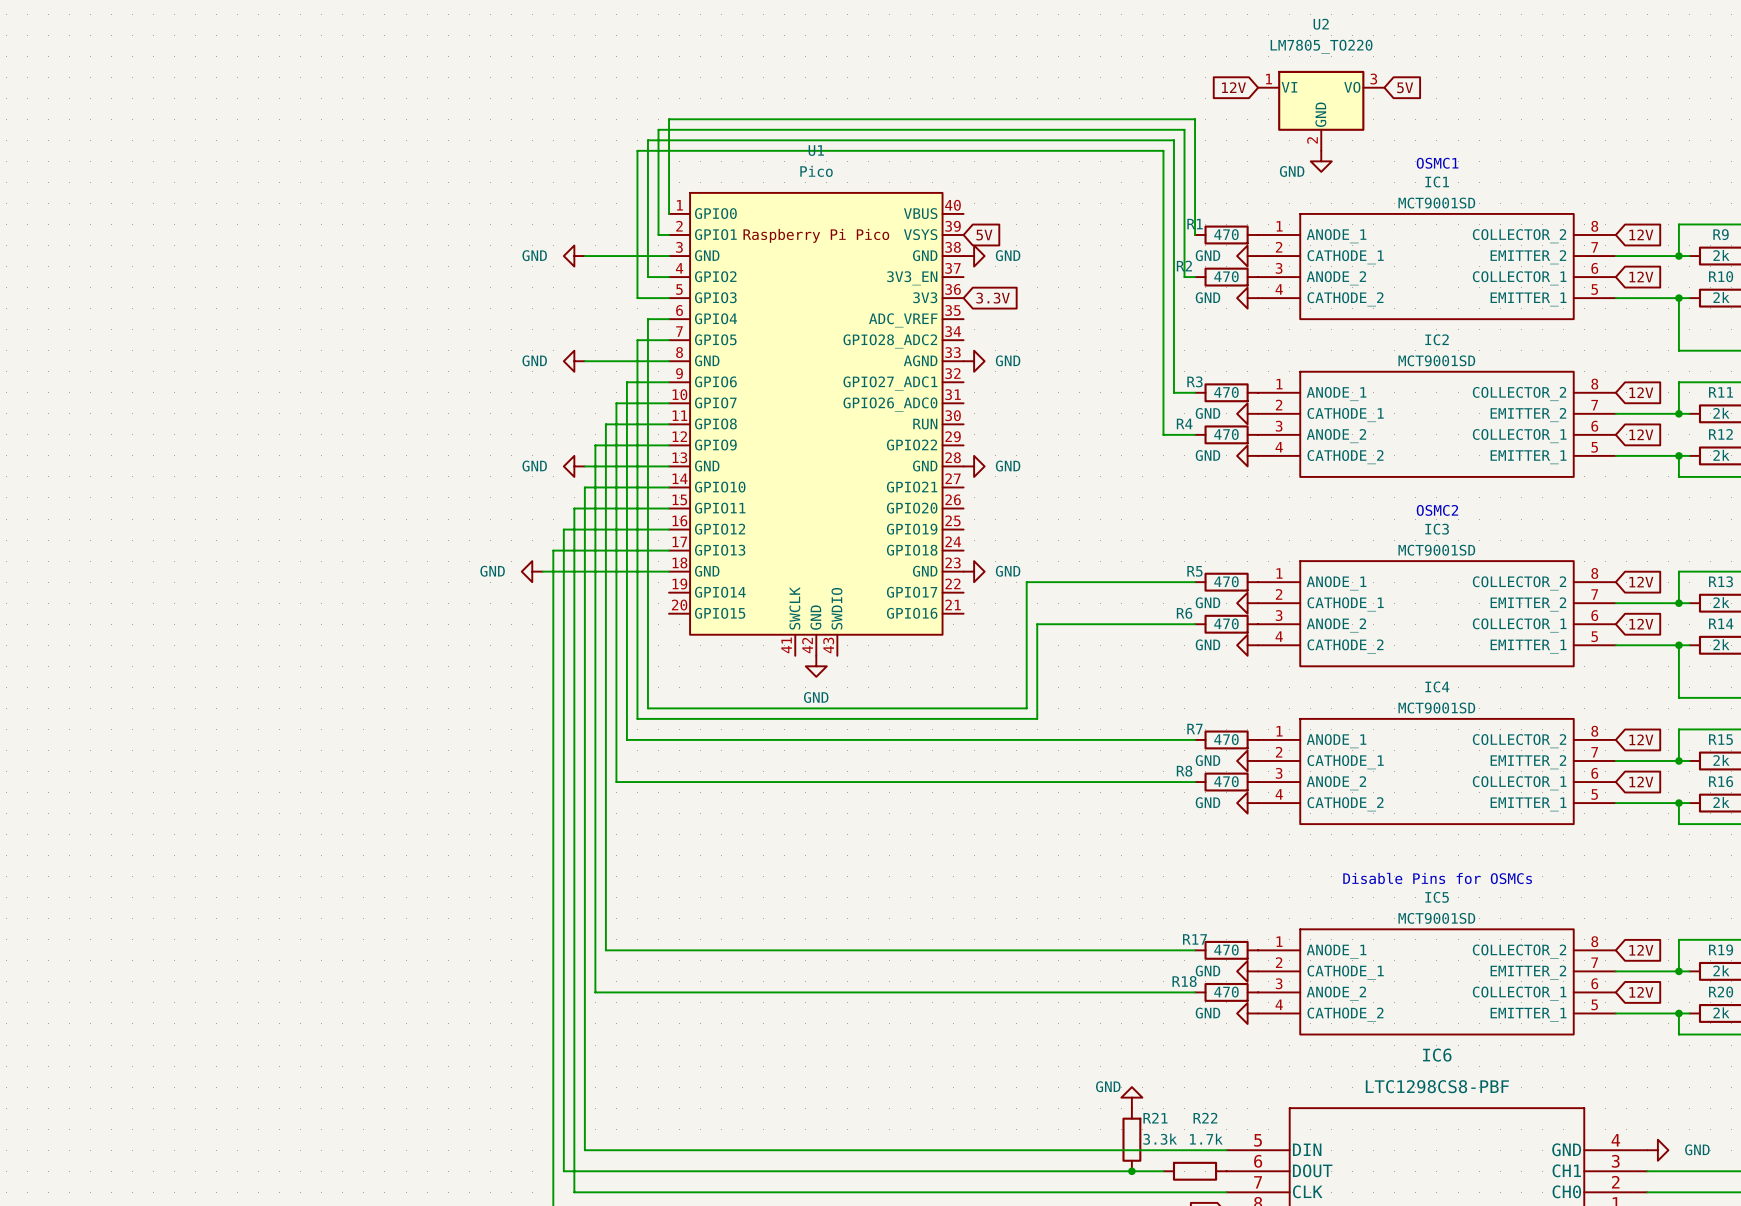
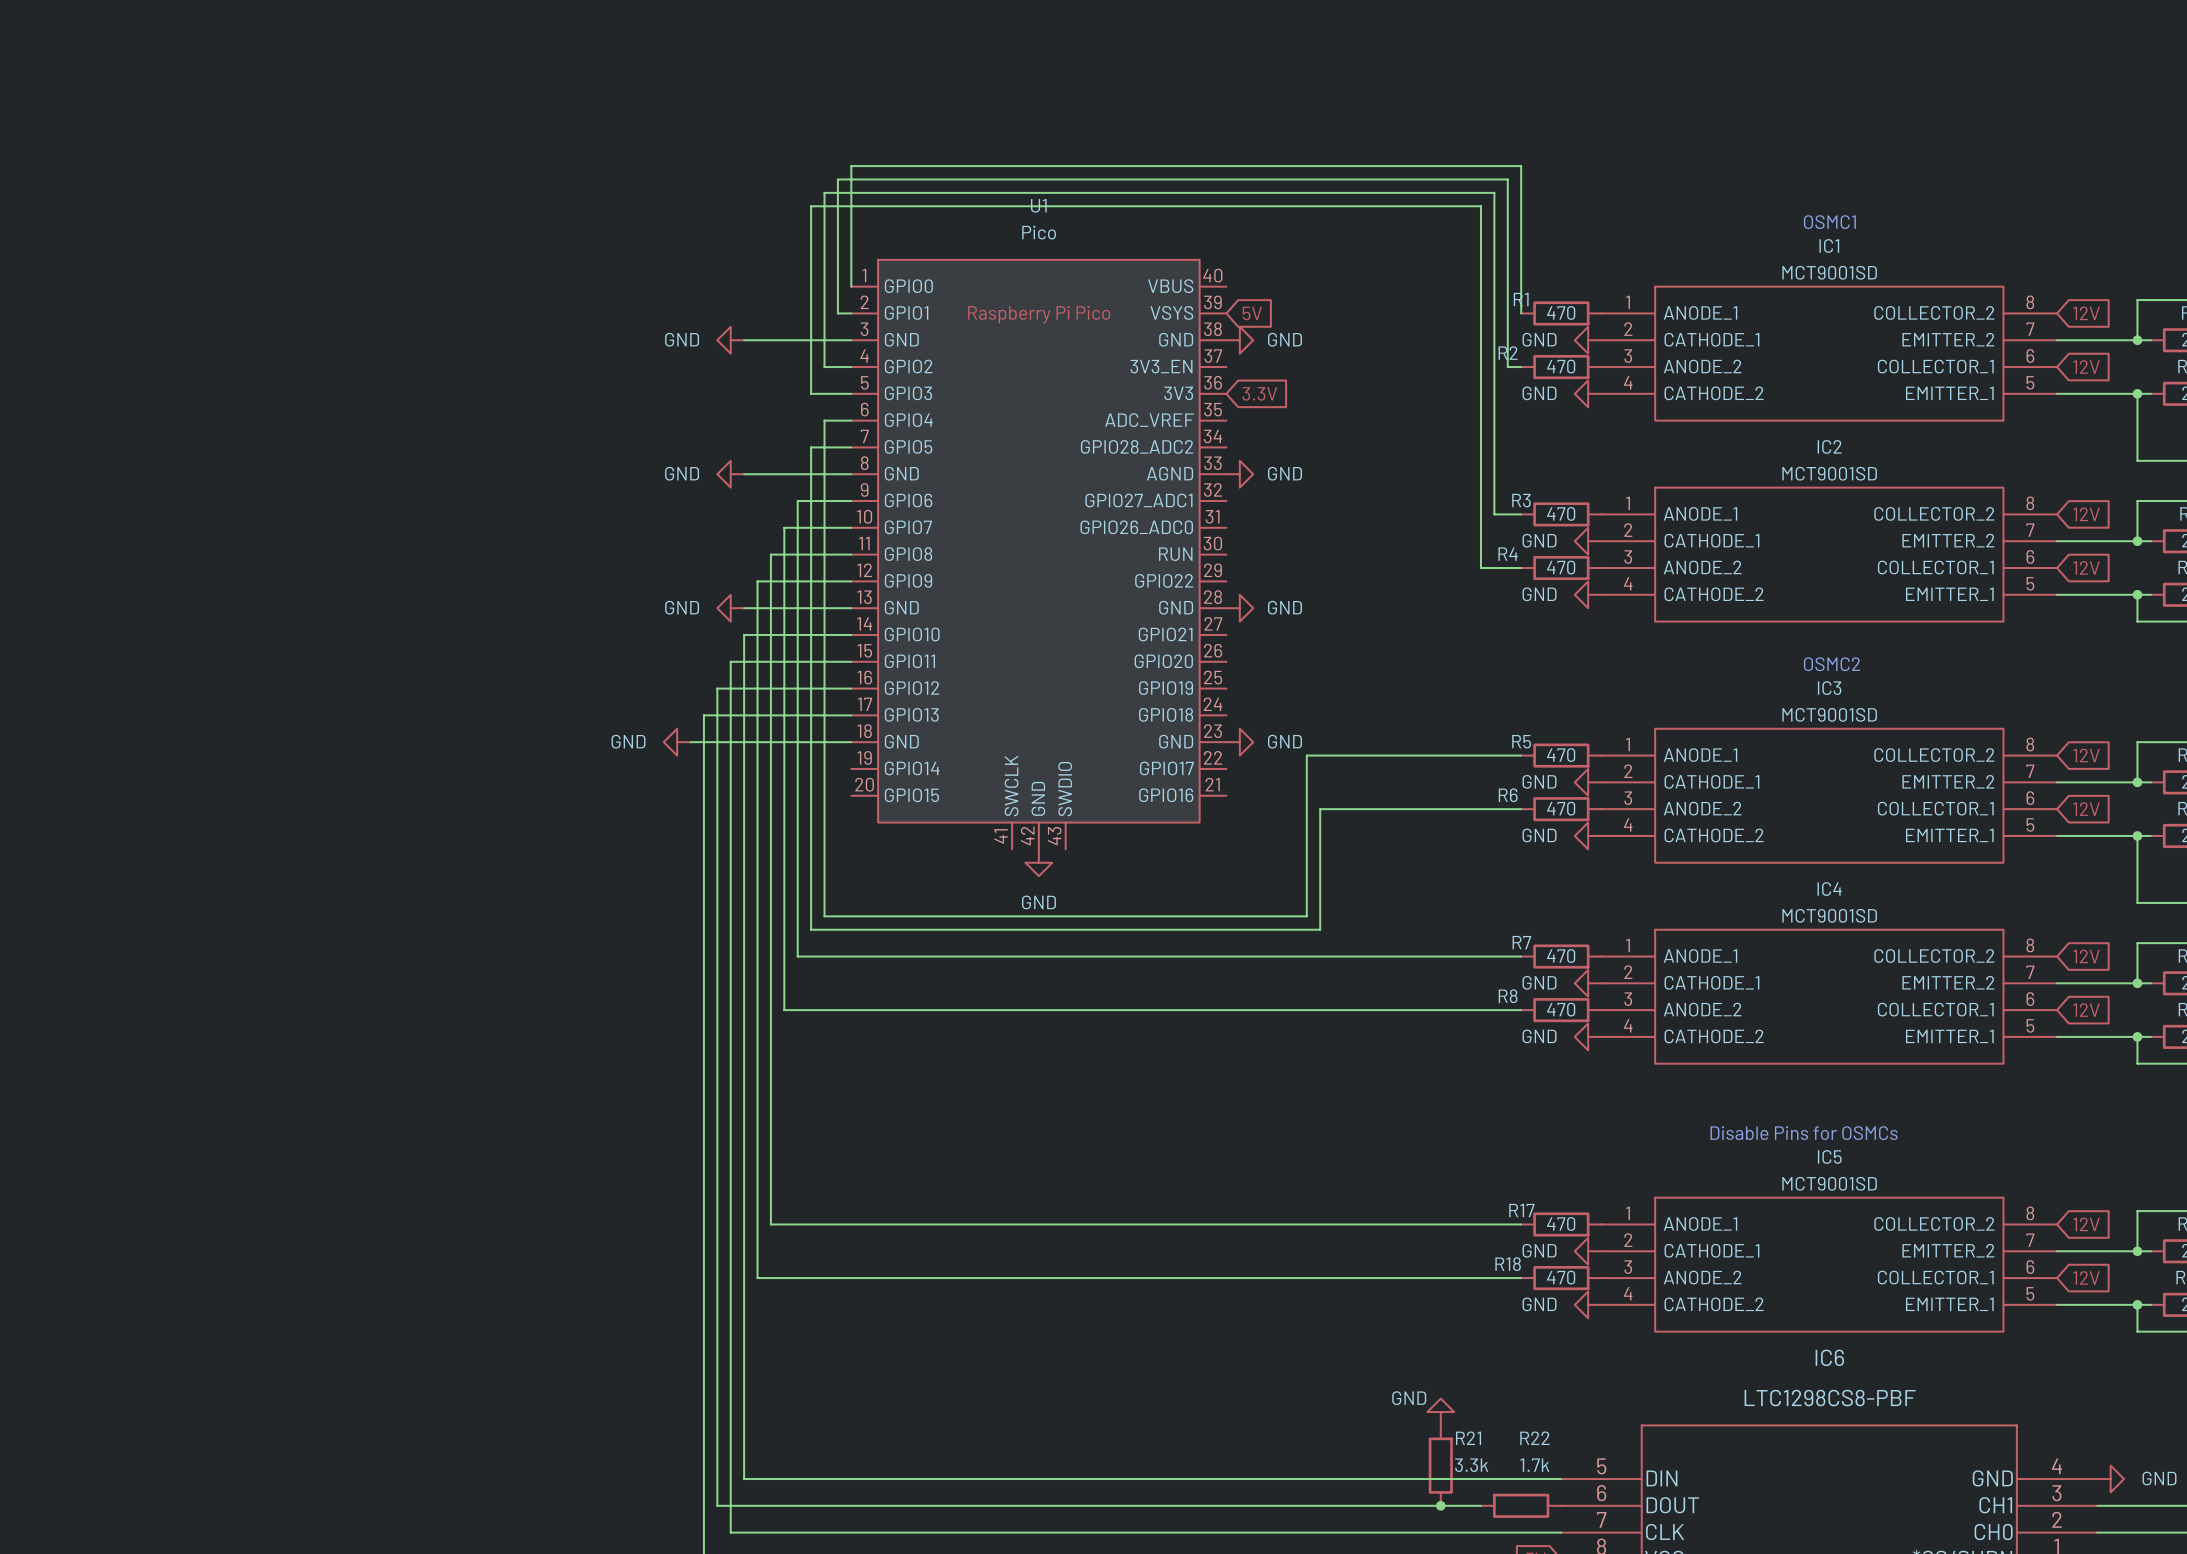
global label: 12V (1233, 87) -> none
global label: 5V (1405, 87) -> none
U2: LM7805_TO220 (1321, 110) -> none
power symbol: GND (1321, 161) -> none

